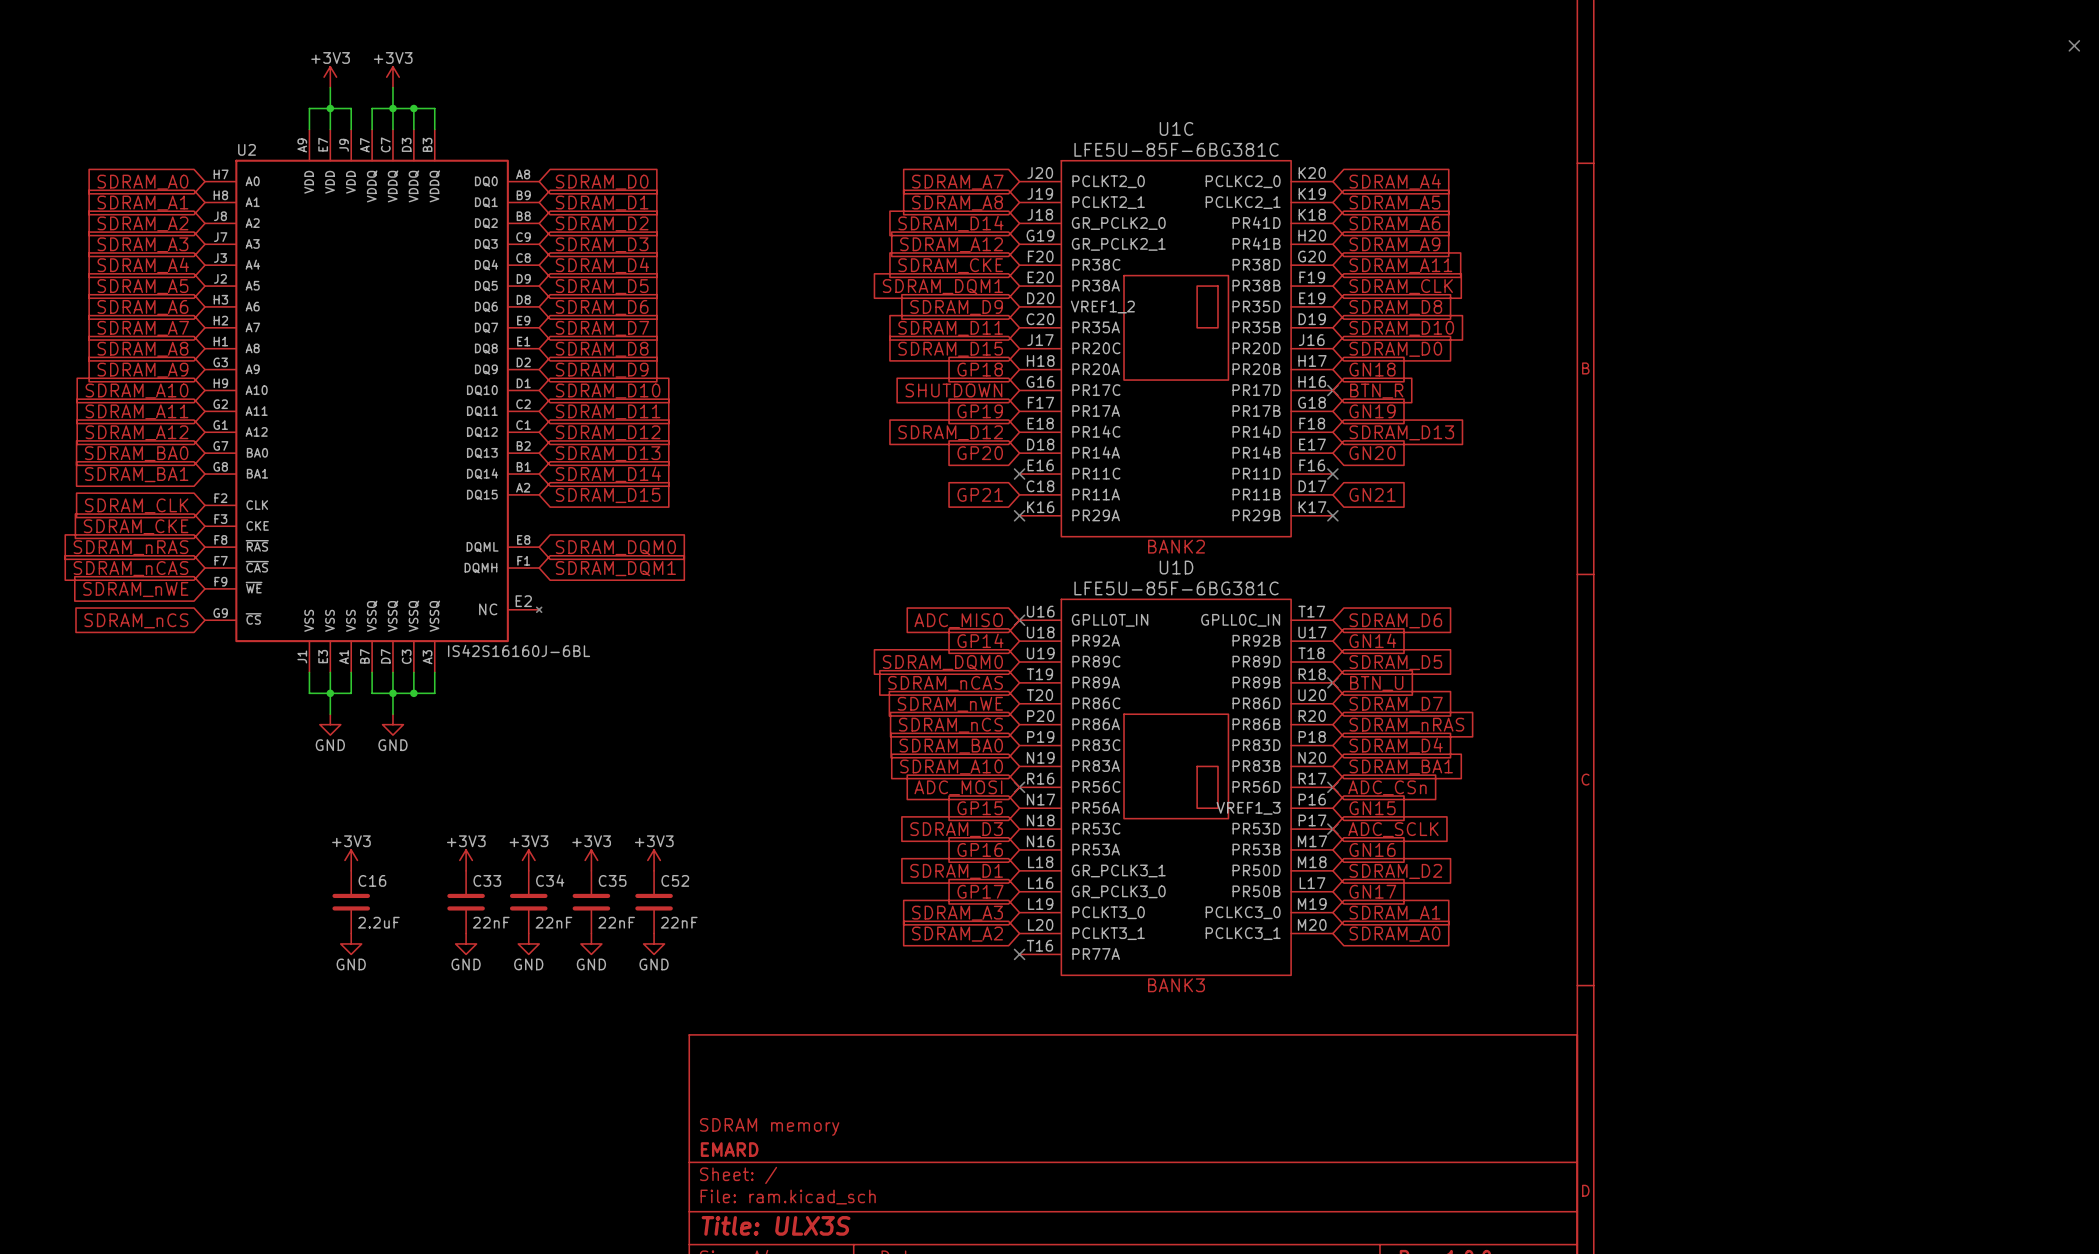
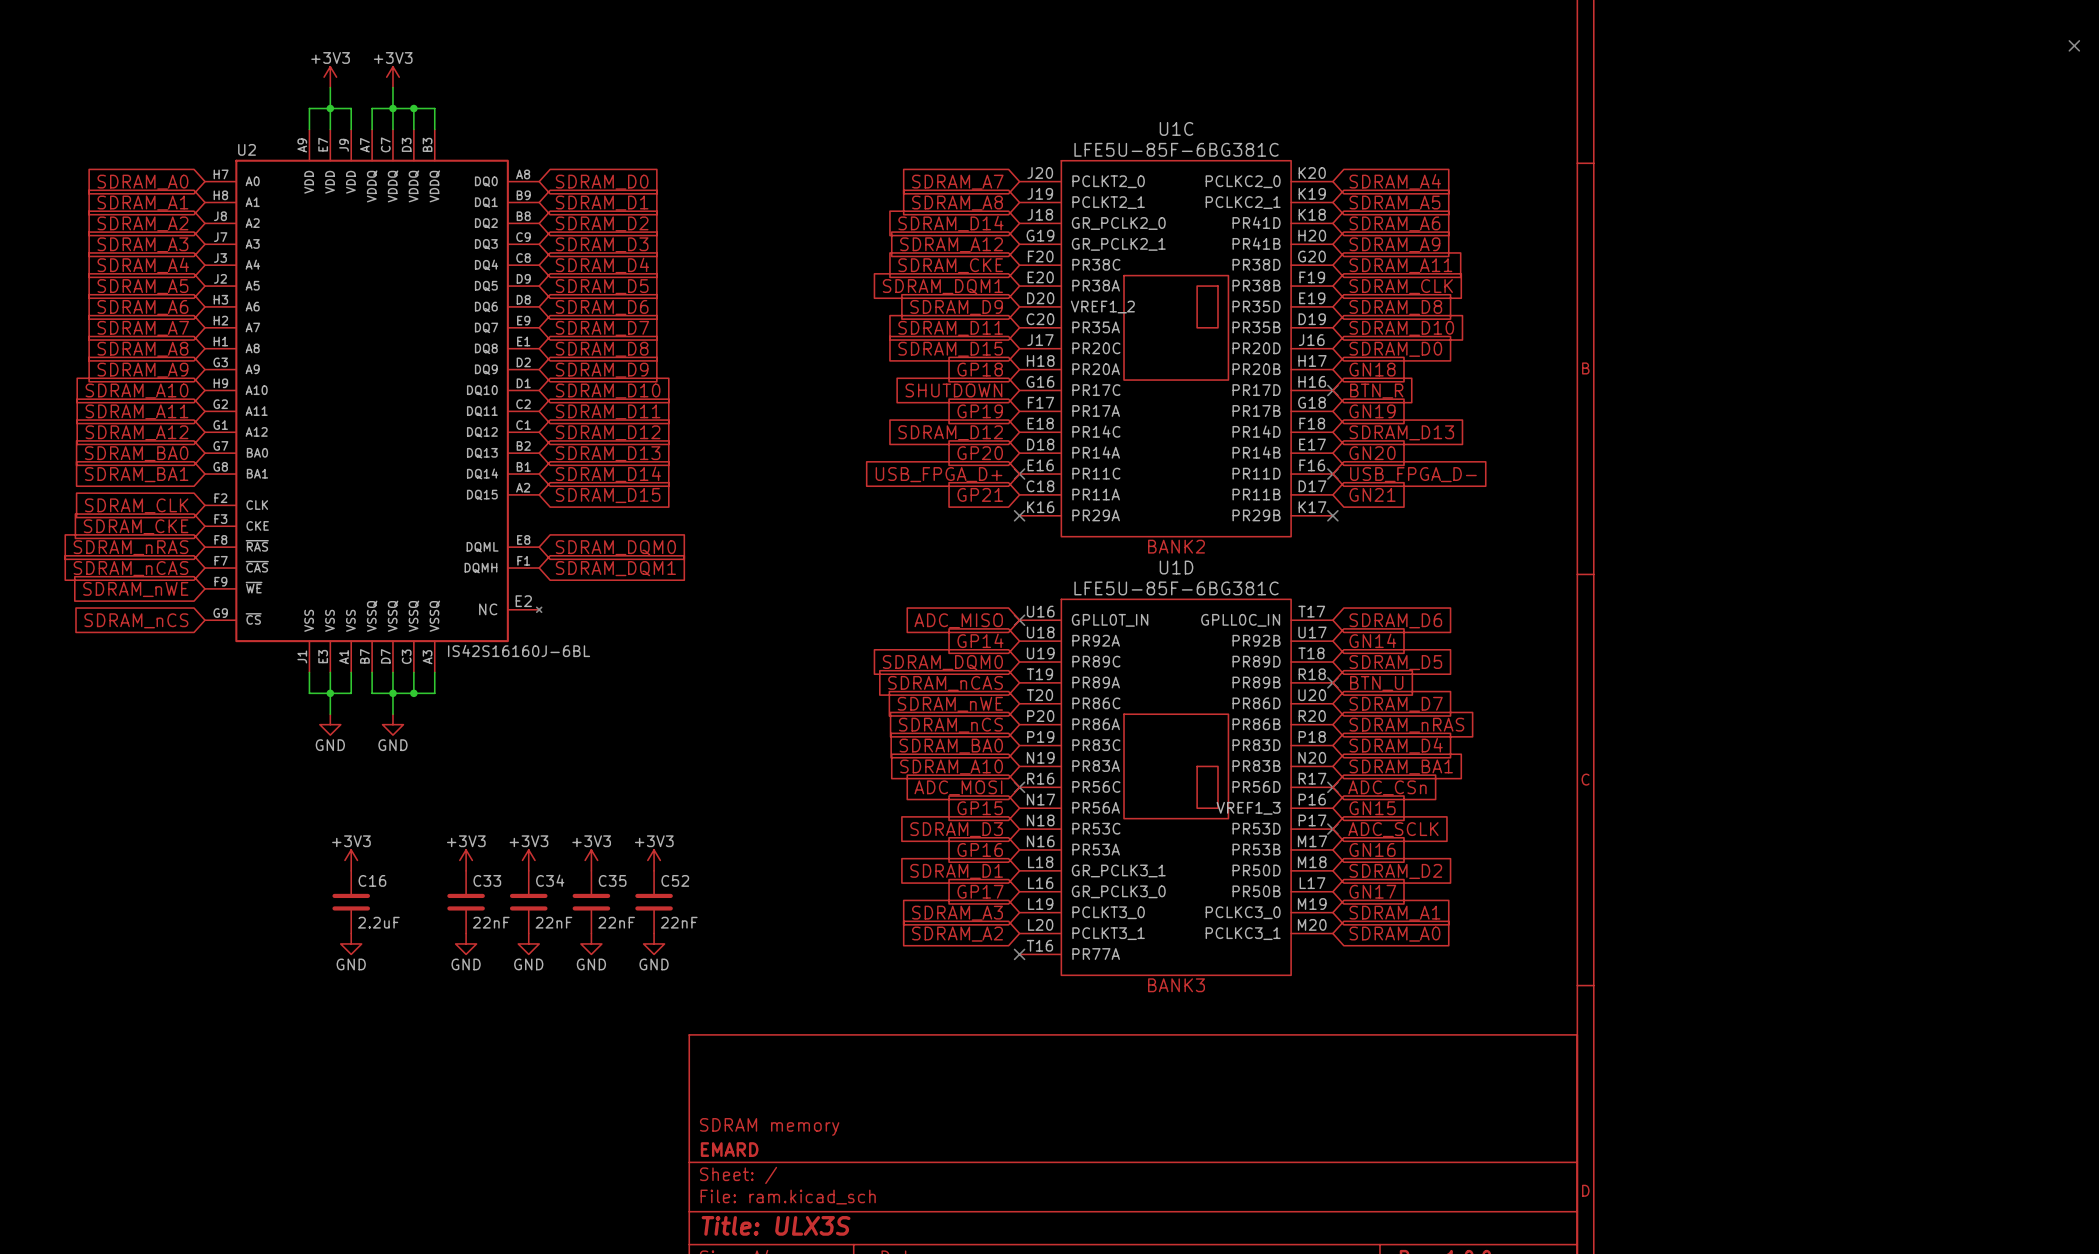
global label: none -> USB_FPGA_D+ (939, 474)
global label: none -> USB_FPGA_D- (1413, 474)

